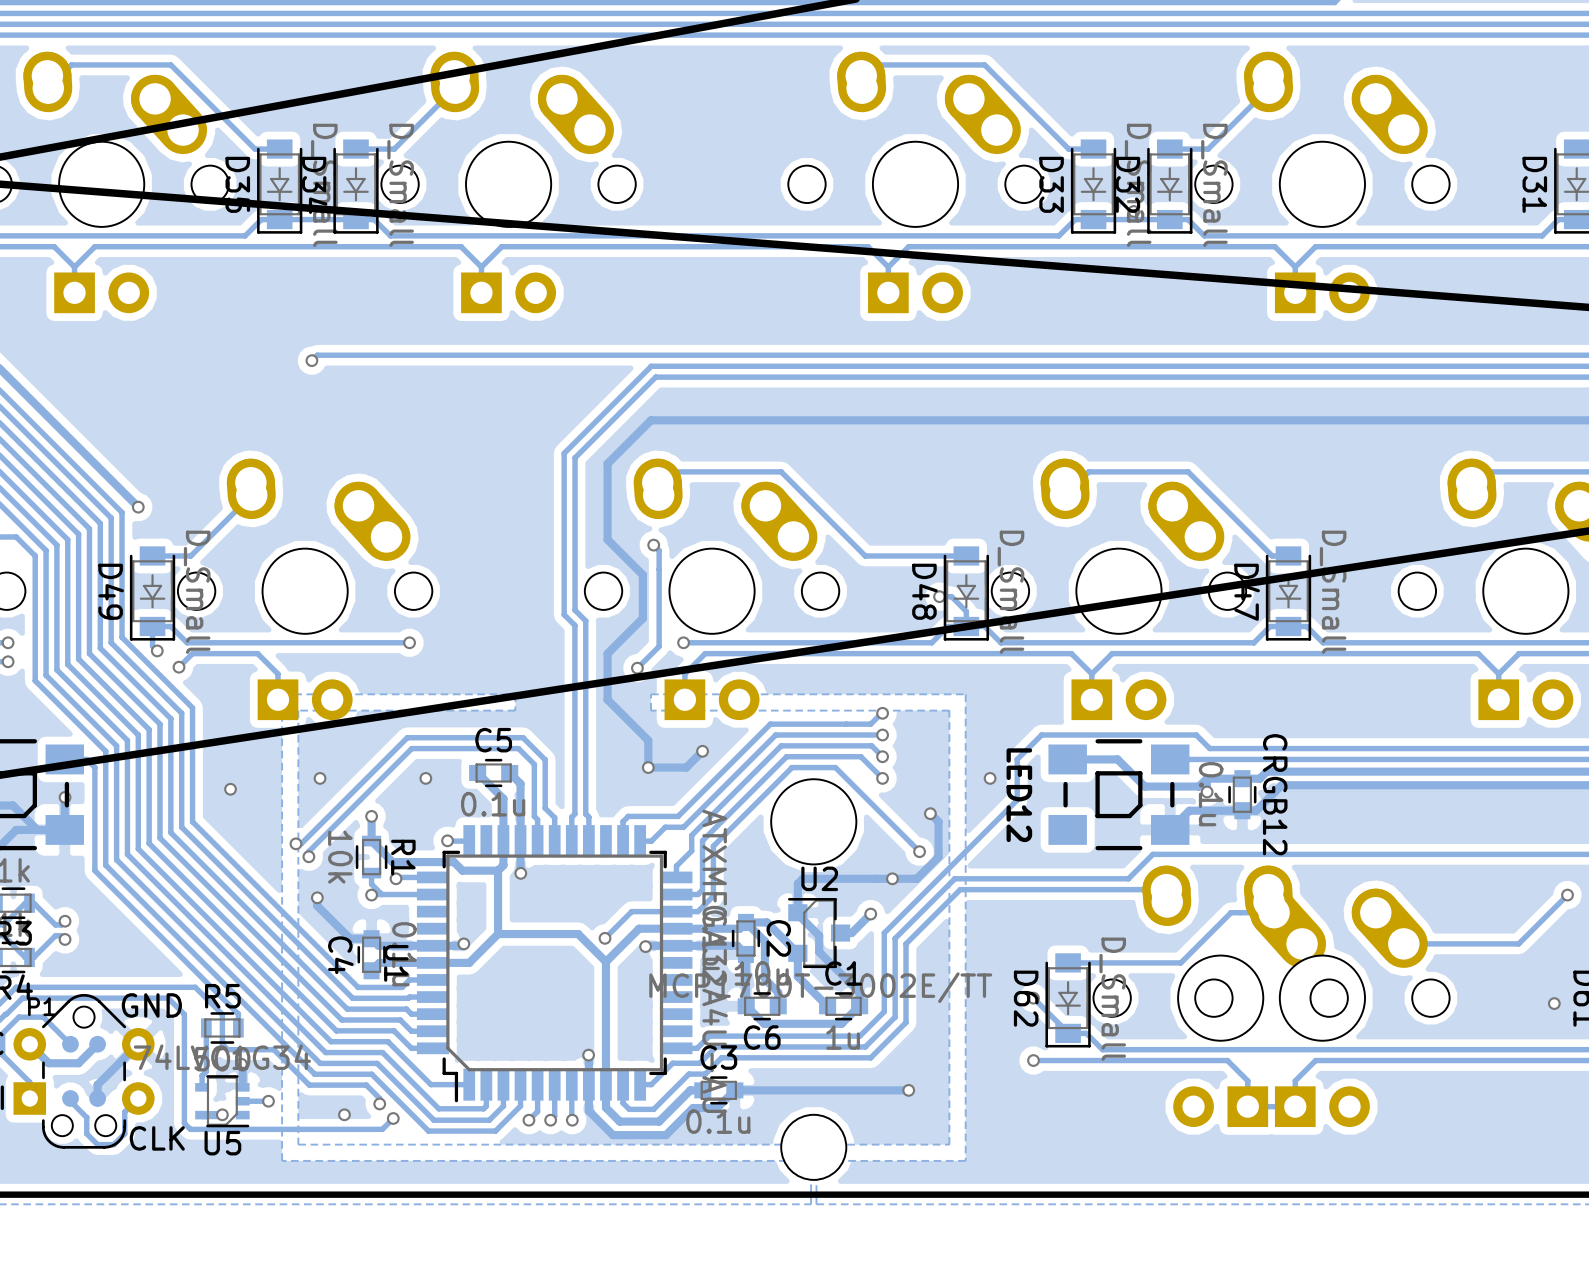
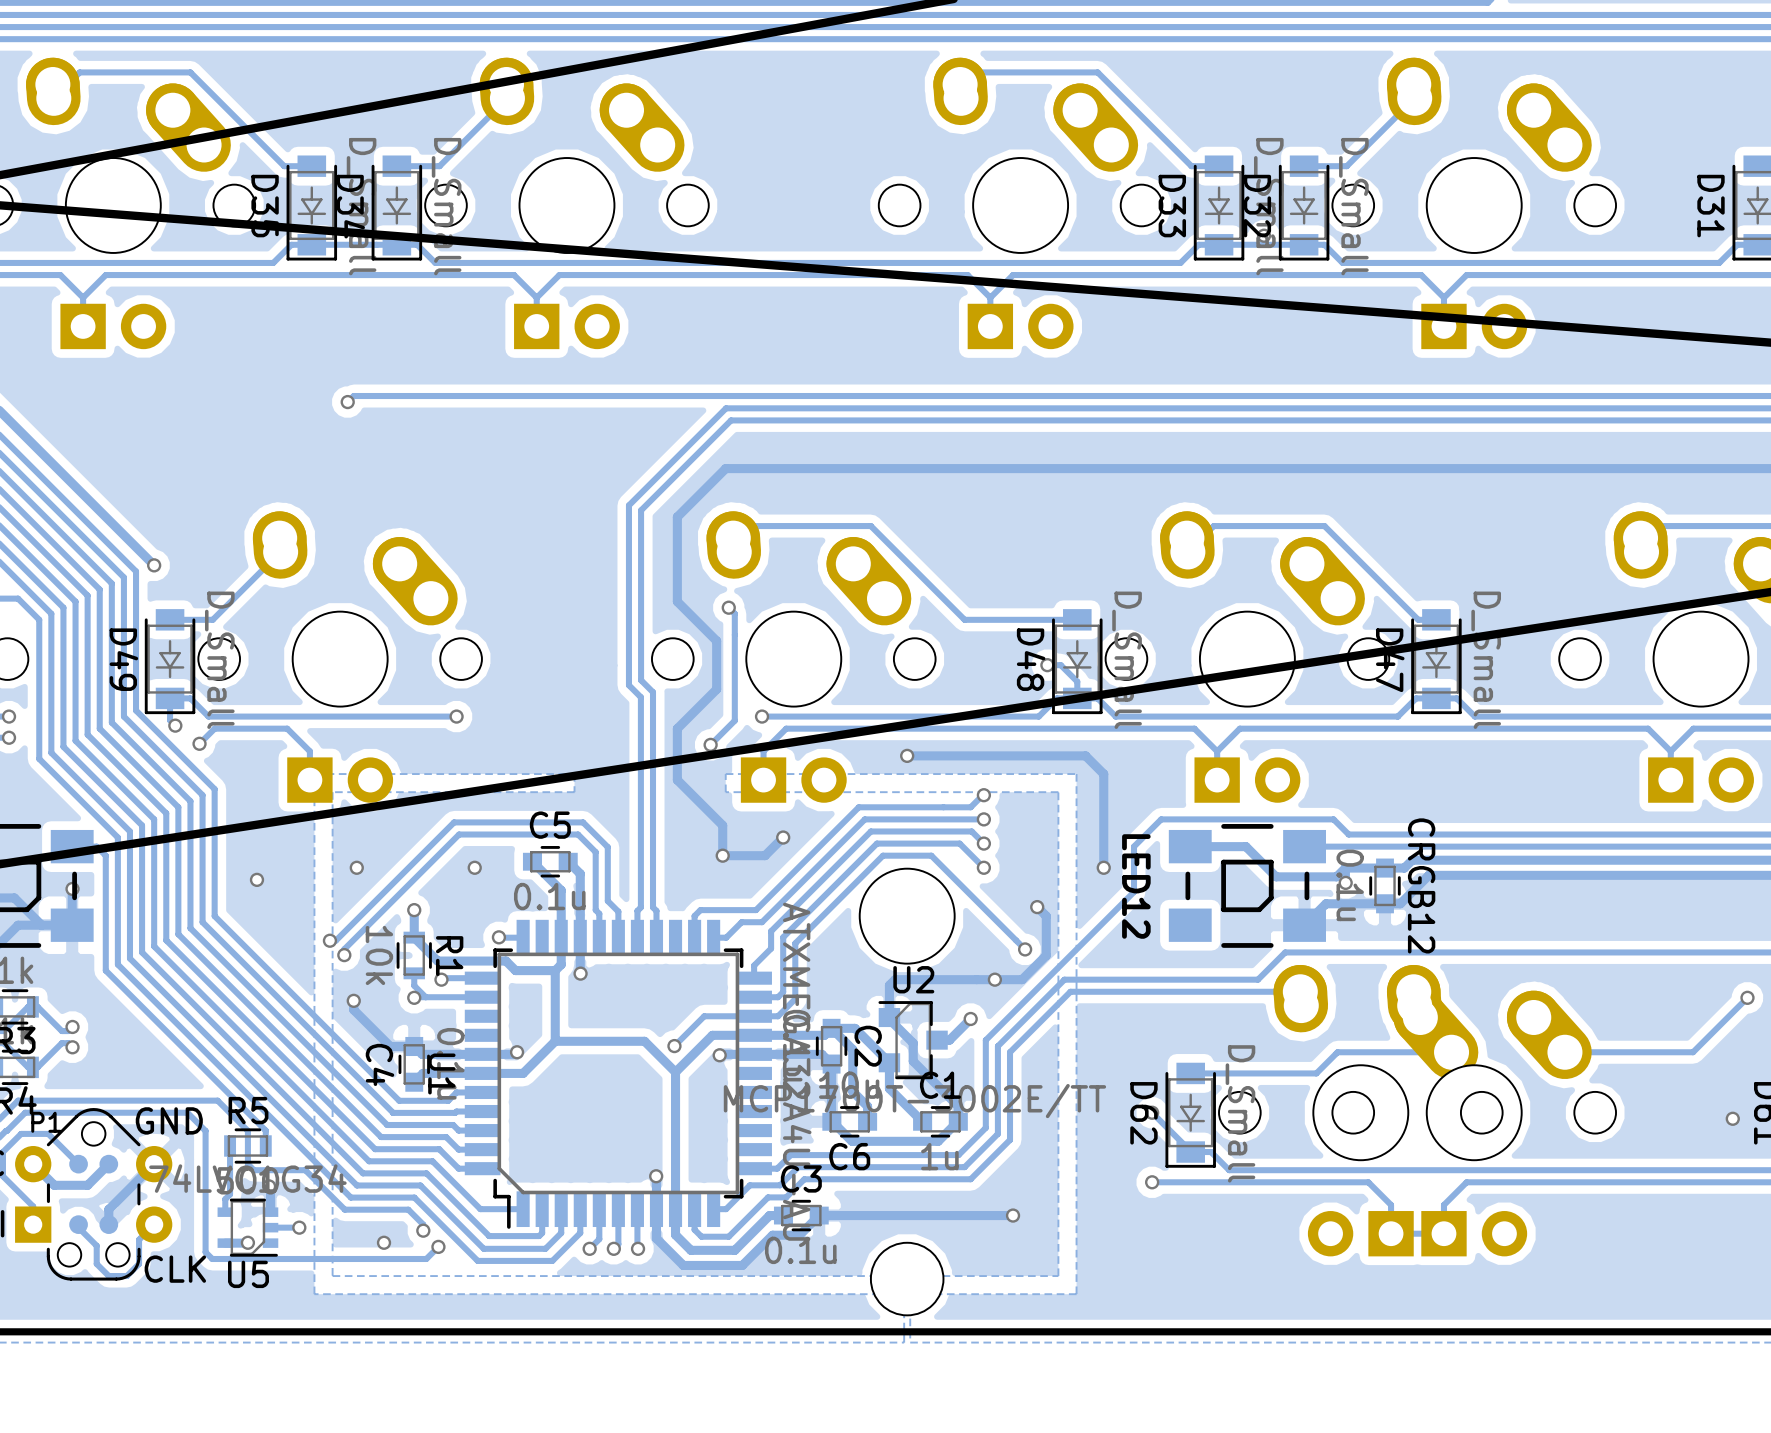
track: none -> (907, 755) (1085, 755) (1103, 774) (1103, 867)
via: none -> (907, 755)
track: (1274, 912) (1231, 912) (1199, 943) -> (1451, 1052) (1337, 1052)

